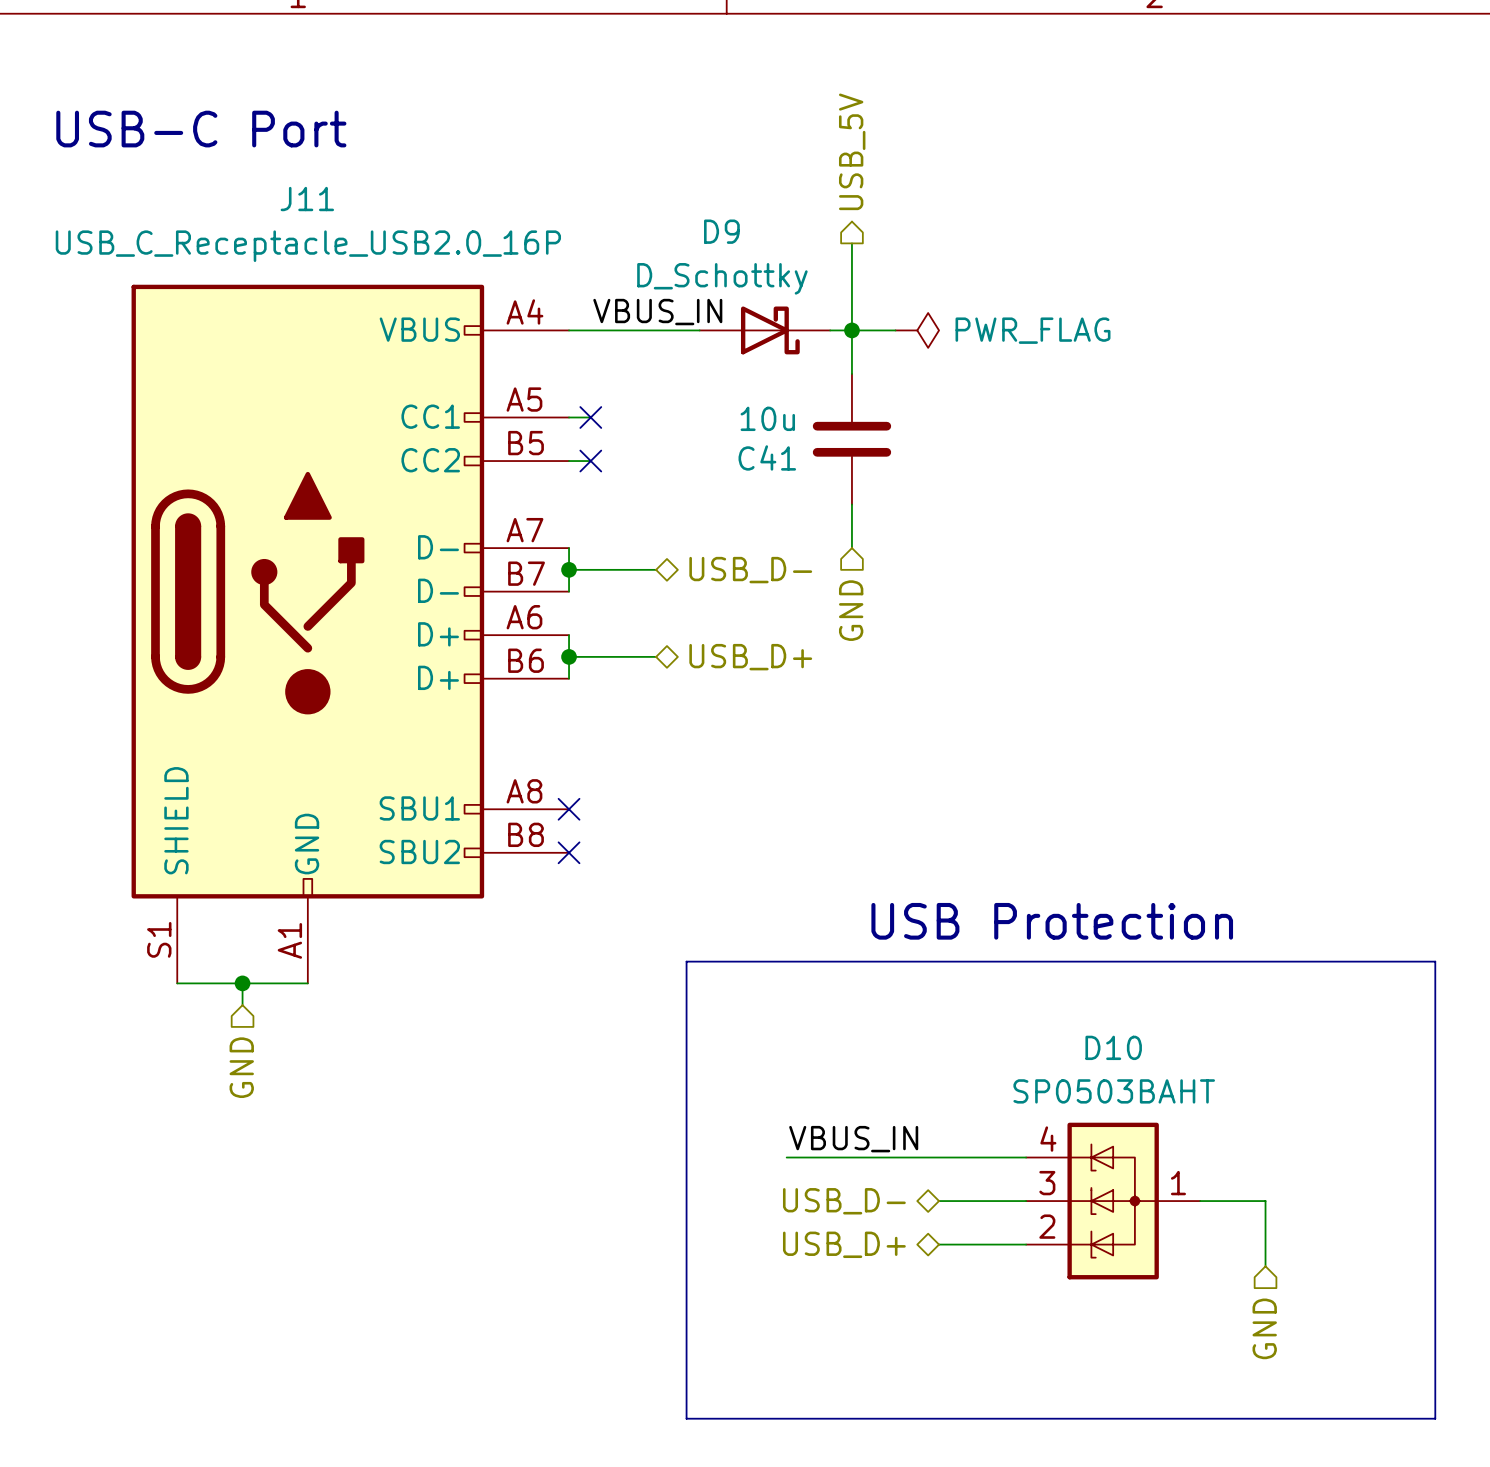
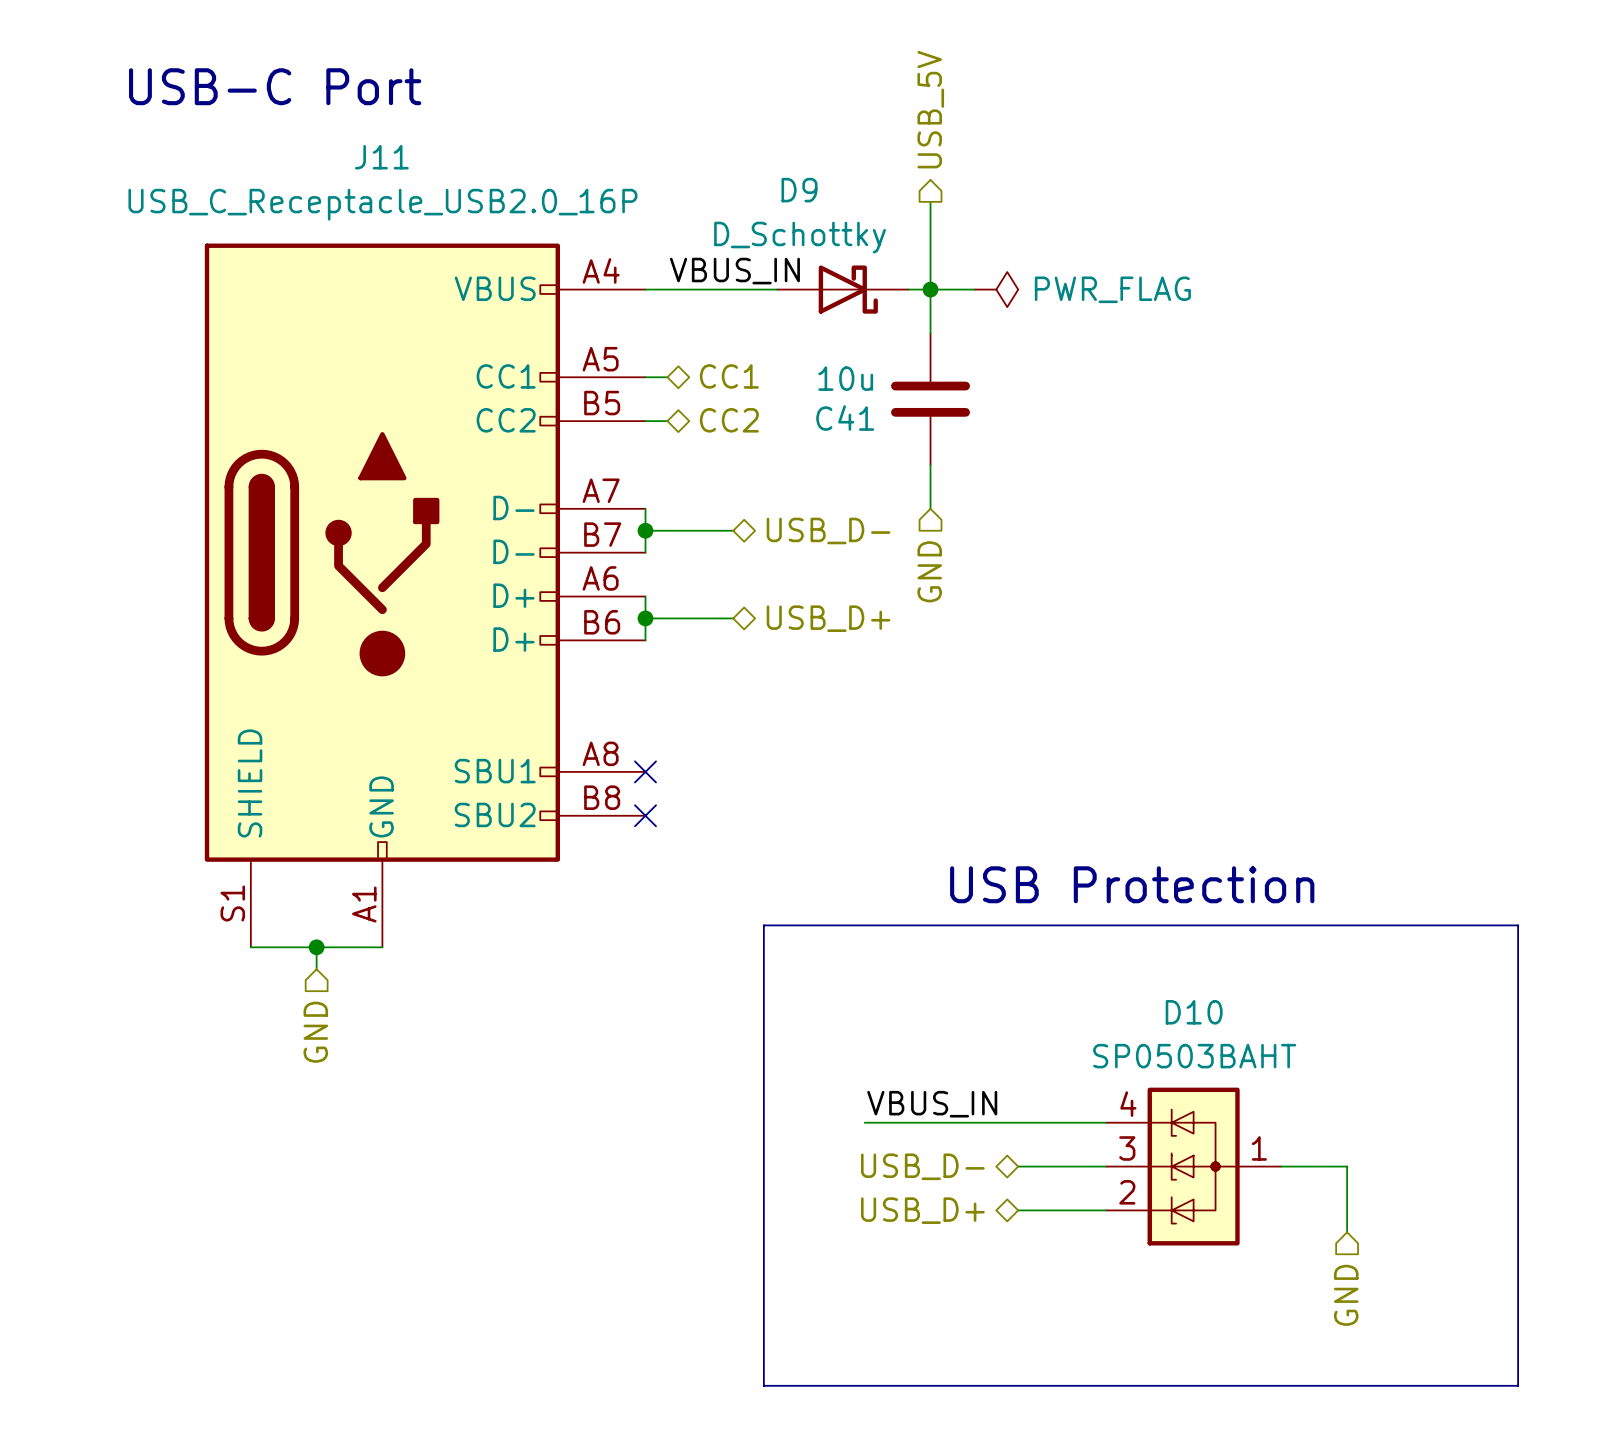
hierarchical label: none -> CC1 (729, 376)
no-connect mark: (590, 417) -> none
hierarchical label: none -> CC2 (729, 420)
no-connect mark: (590, 461) -> none

